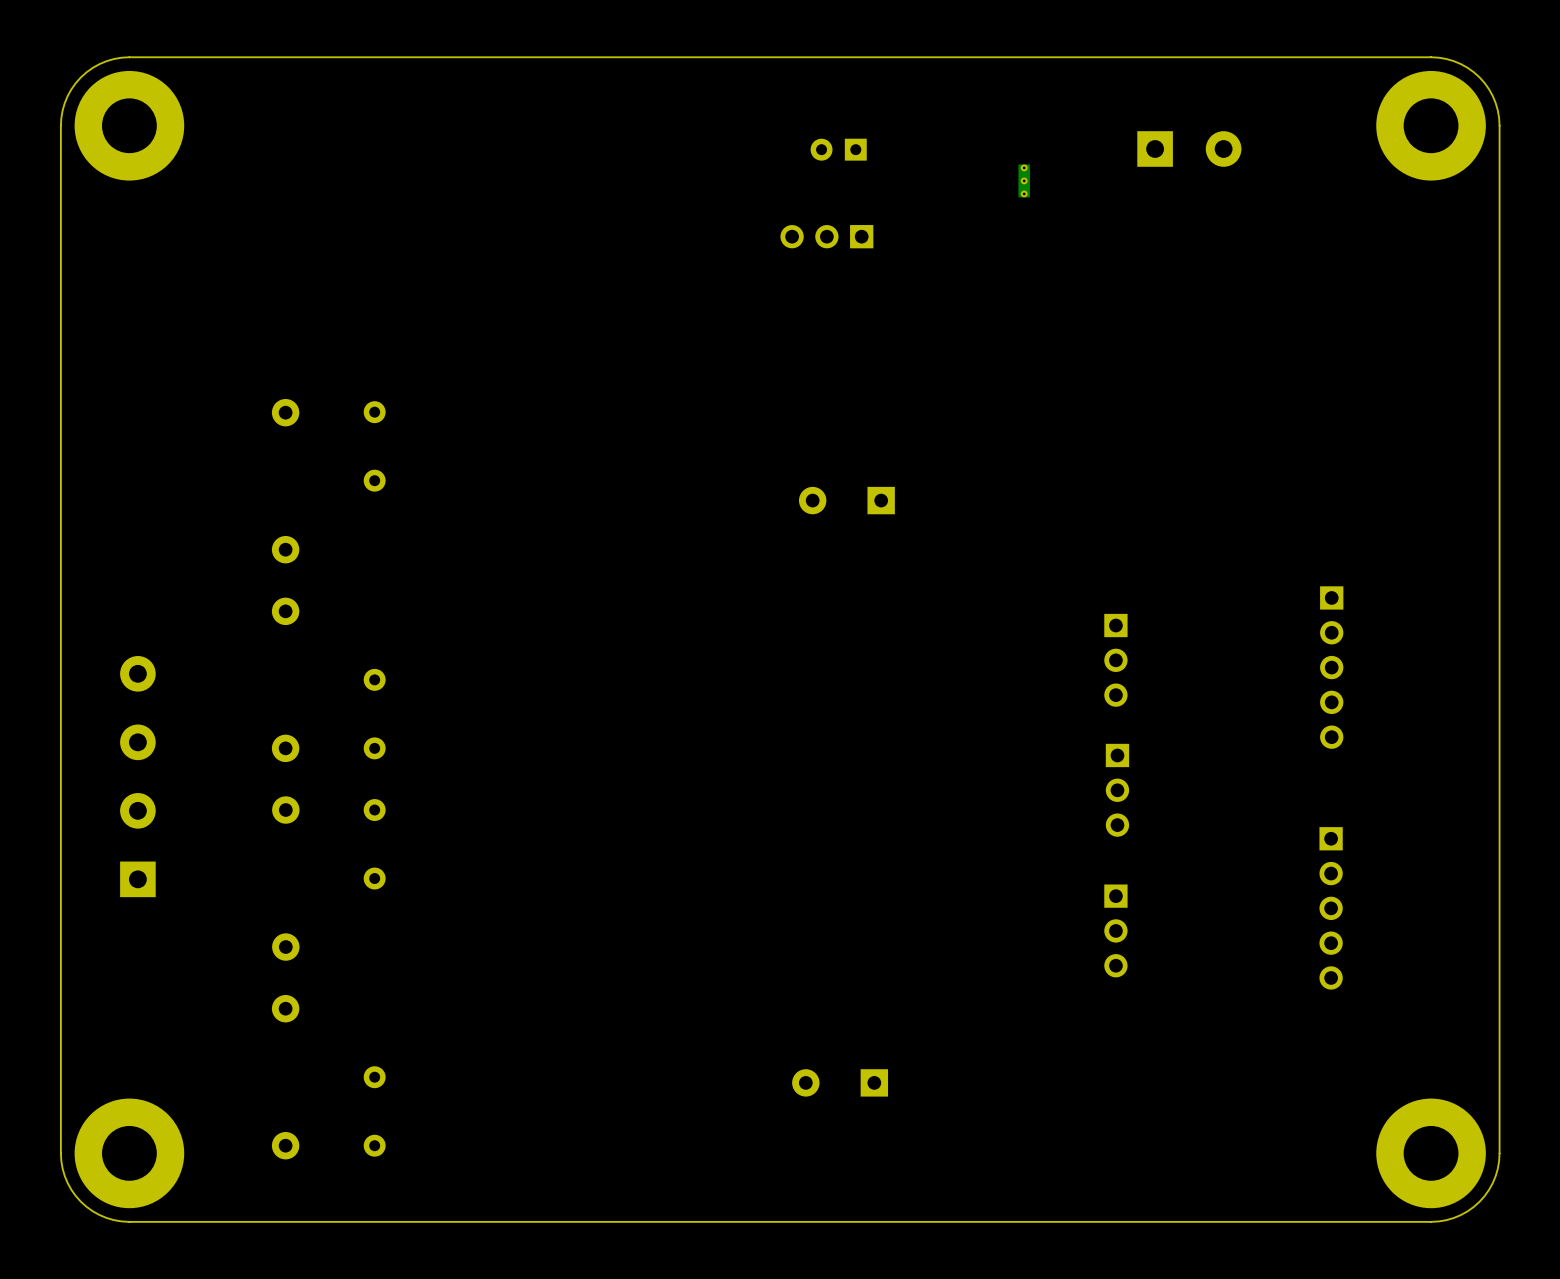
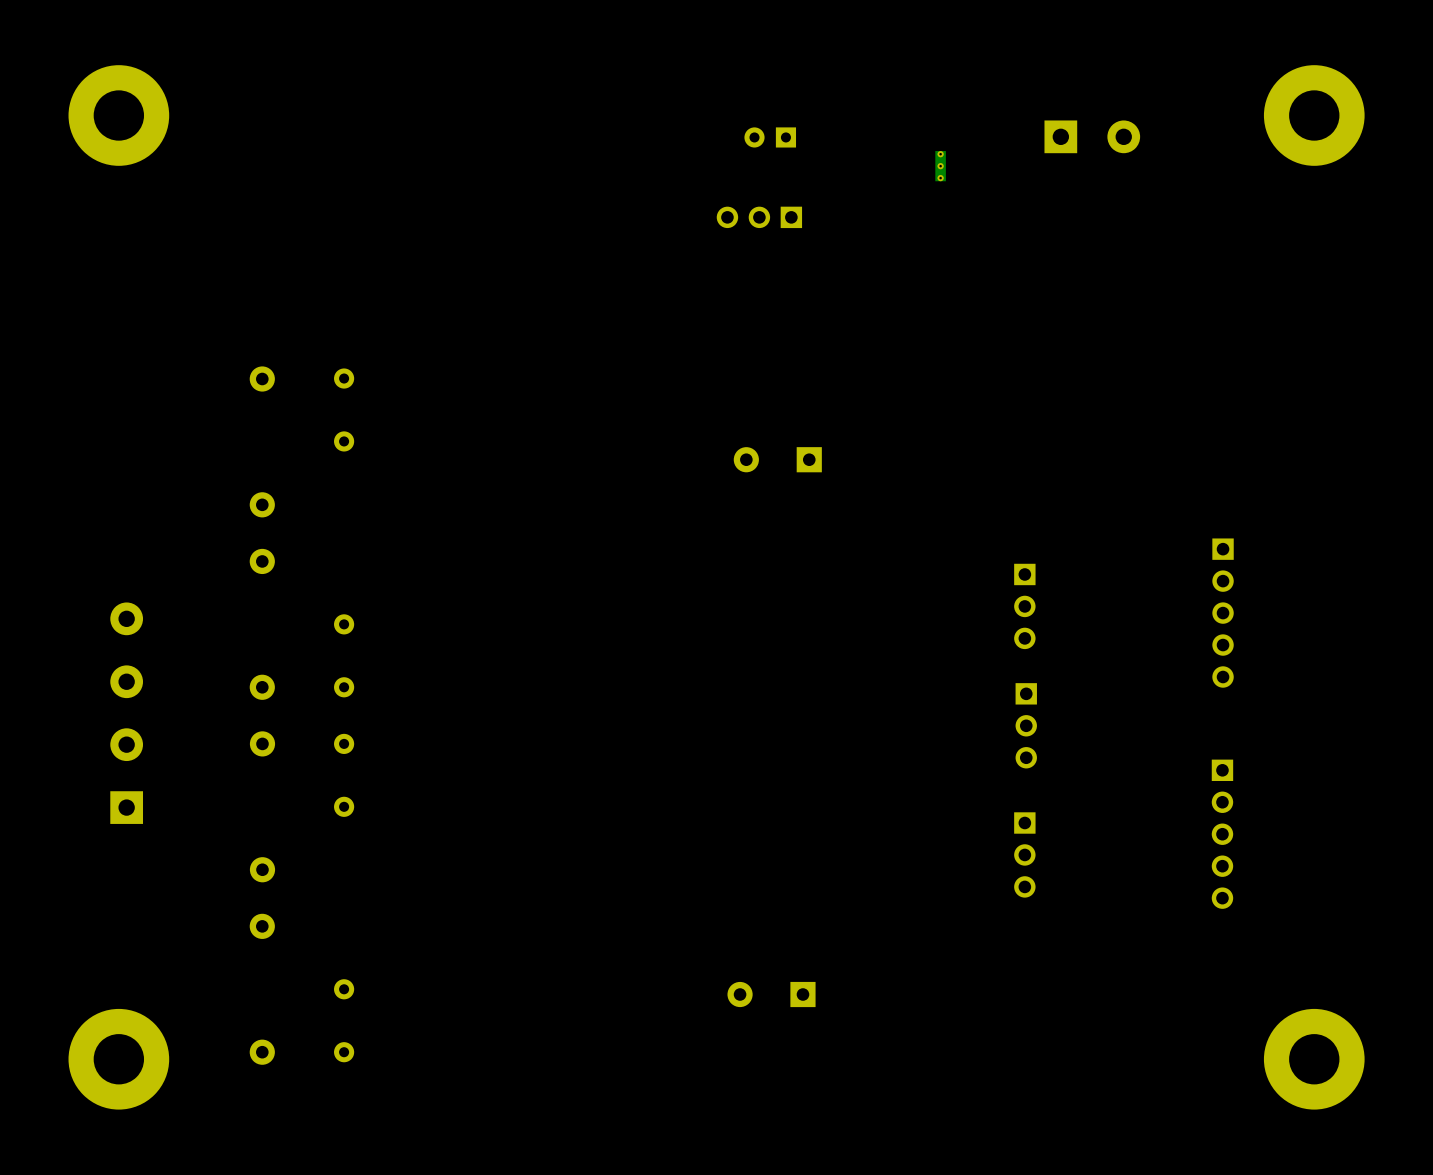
board edge: (1431, 57) (129, 57) (106, 61) (86, 72) (75, 83) (67, 96) (62, 110) (60, 125) (60, 1153) (64, 1176) (75, 1196) (86, 1206) (99, 1215) (114, 1220) (129, 1221) (1431, 1221) (1453, 1218) (1473, 1206) (1484, 1196) (1492, 1183) (1497, 1168) (1499, 1153) (1499, 125) (1495, 103) (1489, 89) (1479, 77) (1460, 64) (1446, 58) (1431, 57) -> none

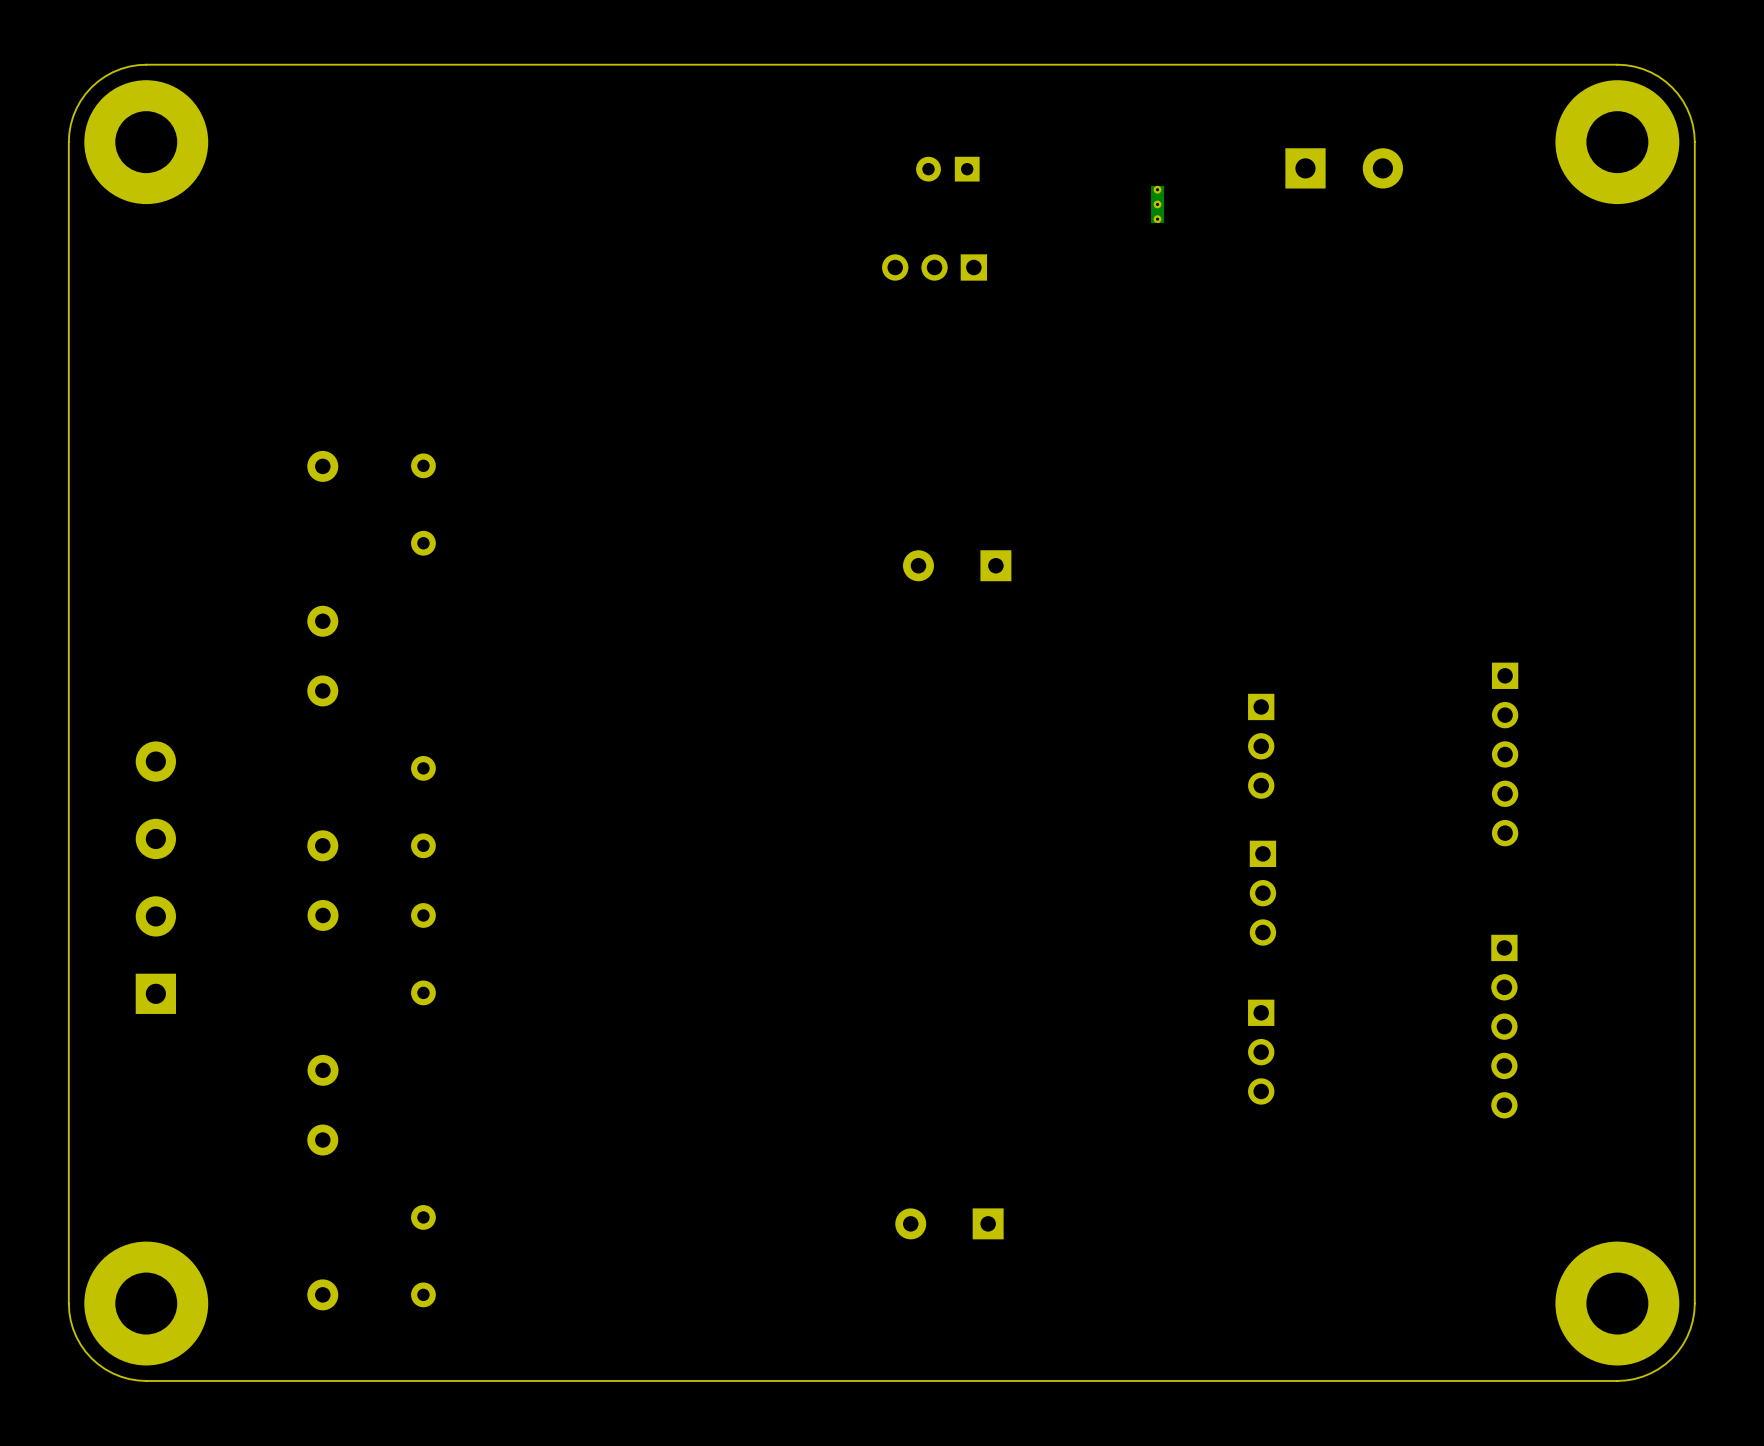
board edge: none -> (1617, 64) (146, 64) (120, 69) (97, 81) (85, 93) (76, 108) (70, 124) (68, 142) (68, 1303) (73, 1329) (85, 1351) (97, 1364) (112, 1373) (129, 1379) (146, 1380) (1617, 1380) (1642, 1376) (1665, 1364) (1677, 1351) (1687, 1337) (1692, 1320) (1694, 1303) (1694, 142) (1690, 116) (1682, 100) (1672, 87) (1650, 72) (1634, 66) (1617, 64)

